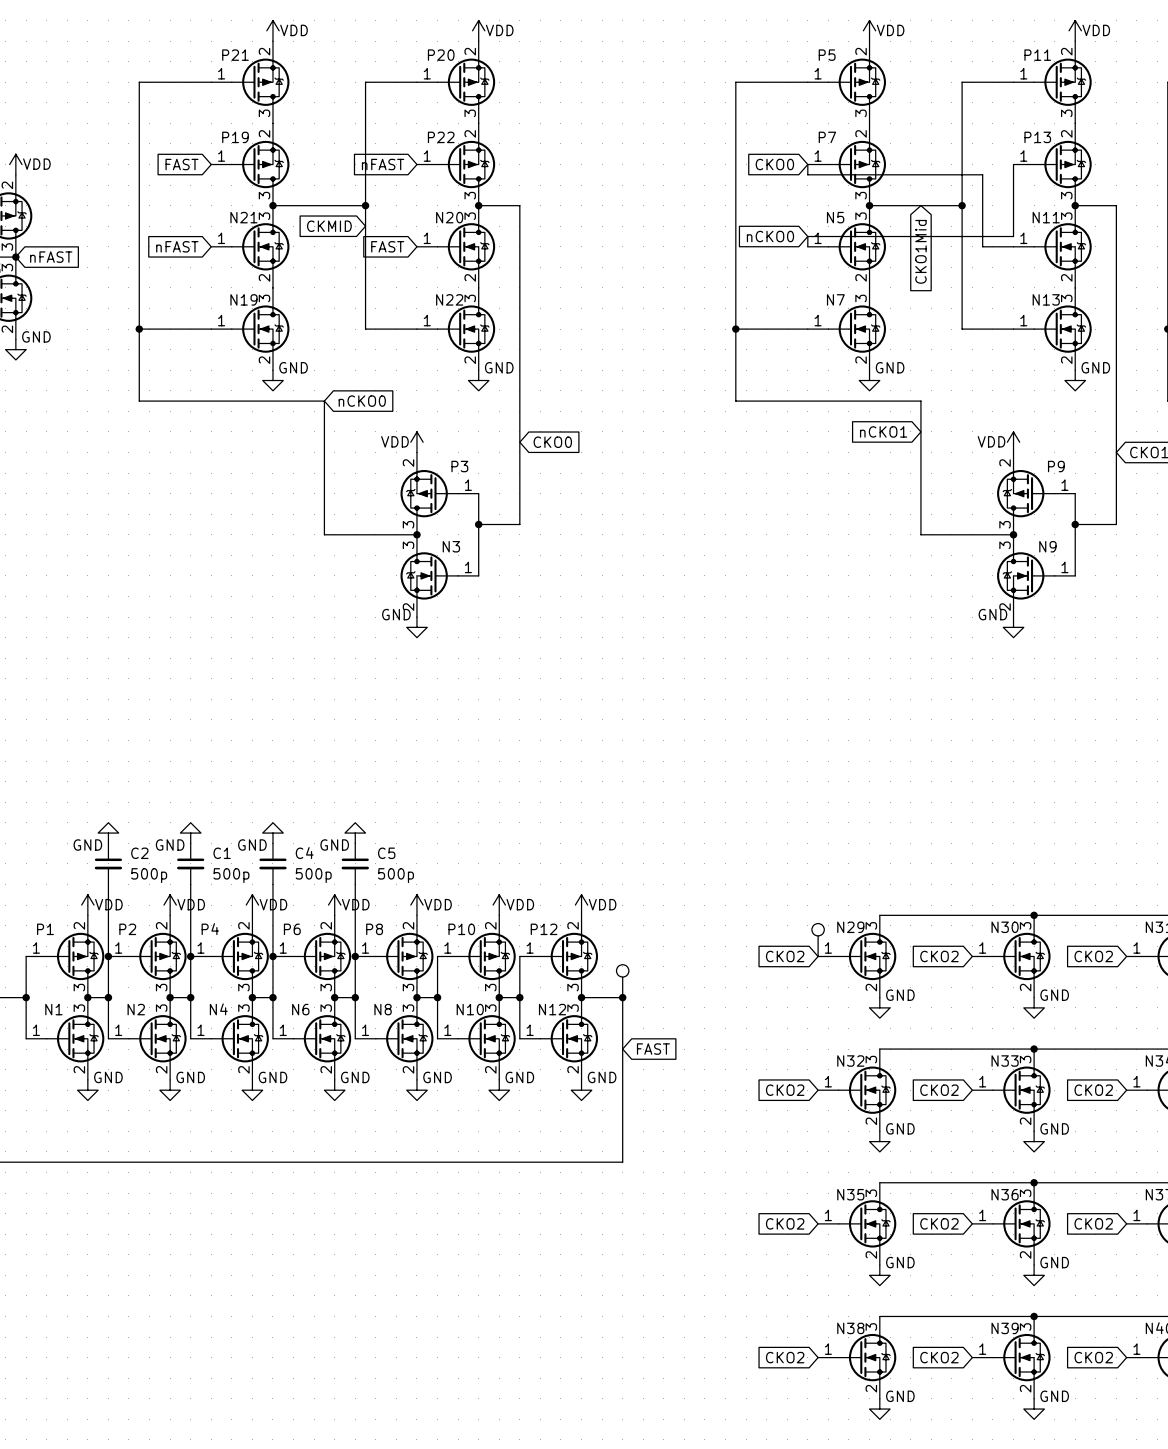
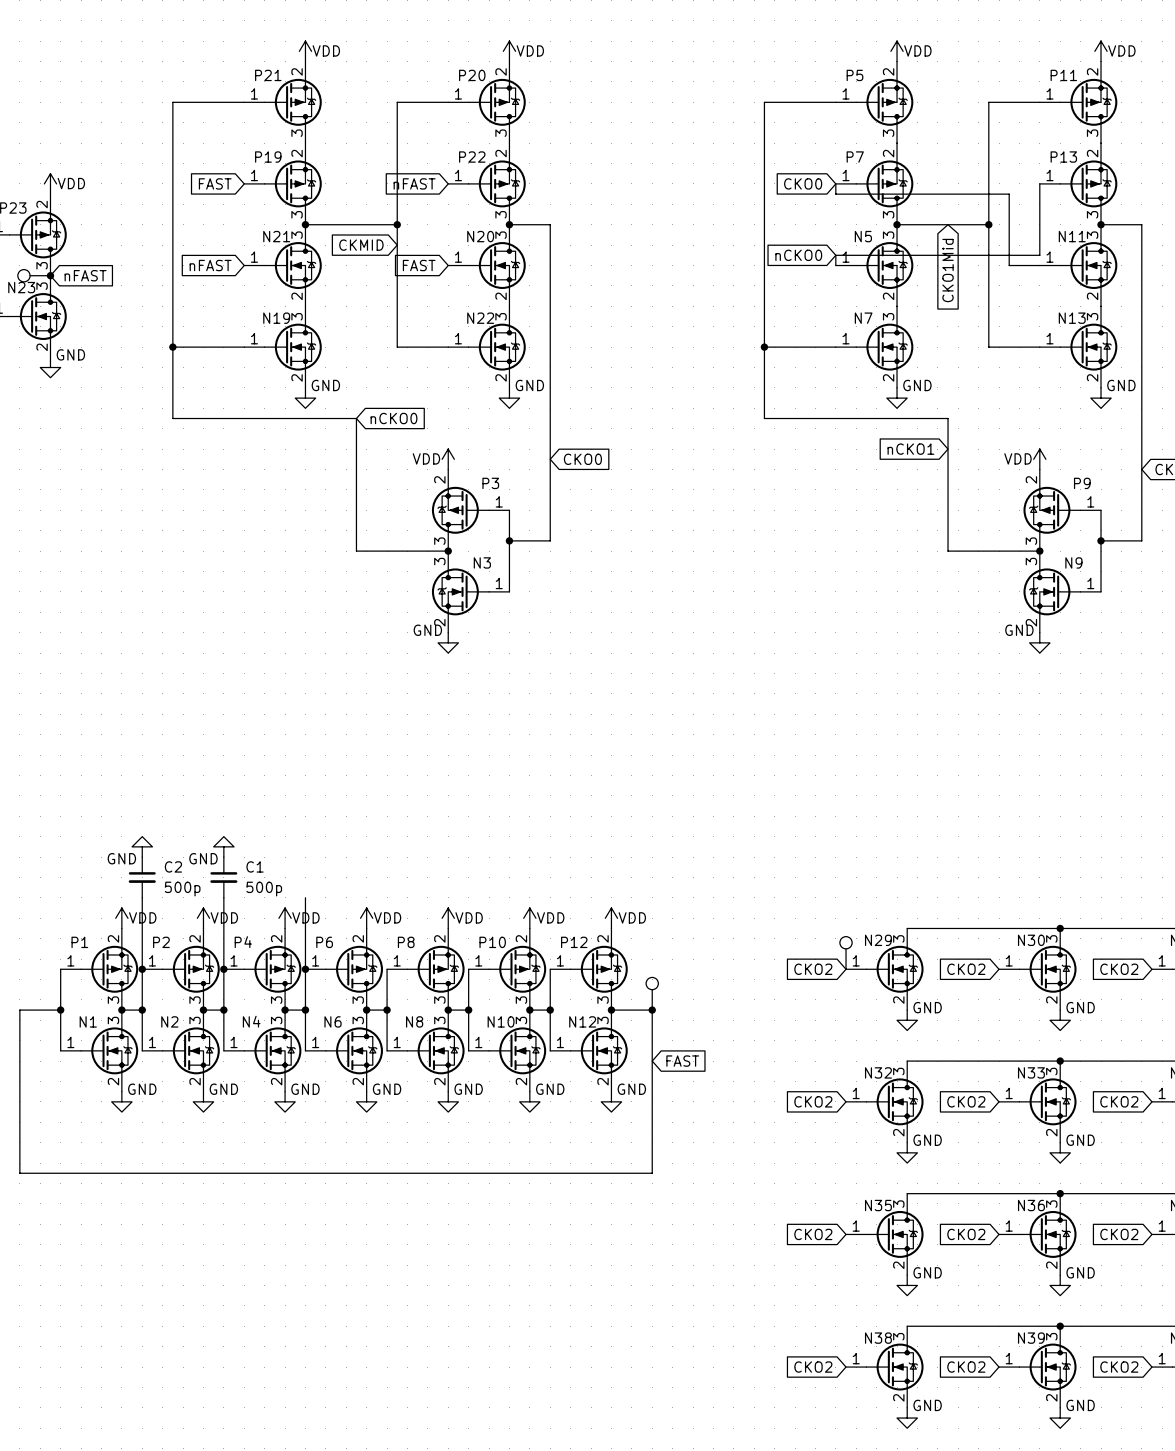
power symbol: GND (272, 833) -> none
power symbol: GND (355, 833) -> none
C4: 500p (272, 863) -> none
C5: 500p (355, 863) -> none
wire: (355, 884) (355, 956) -> none
junction: (355, 956) -> none

